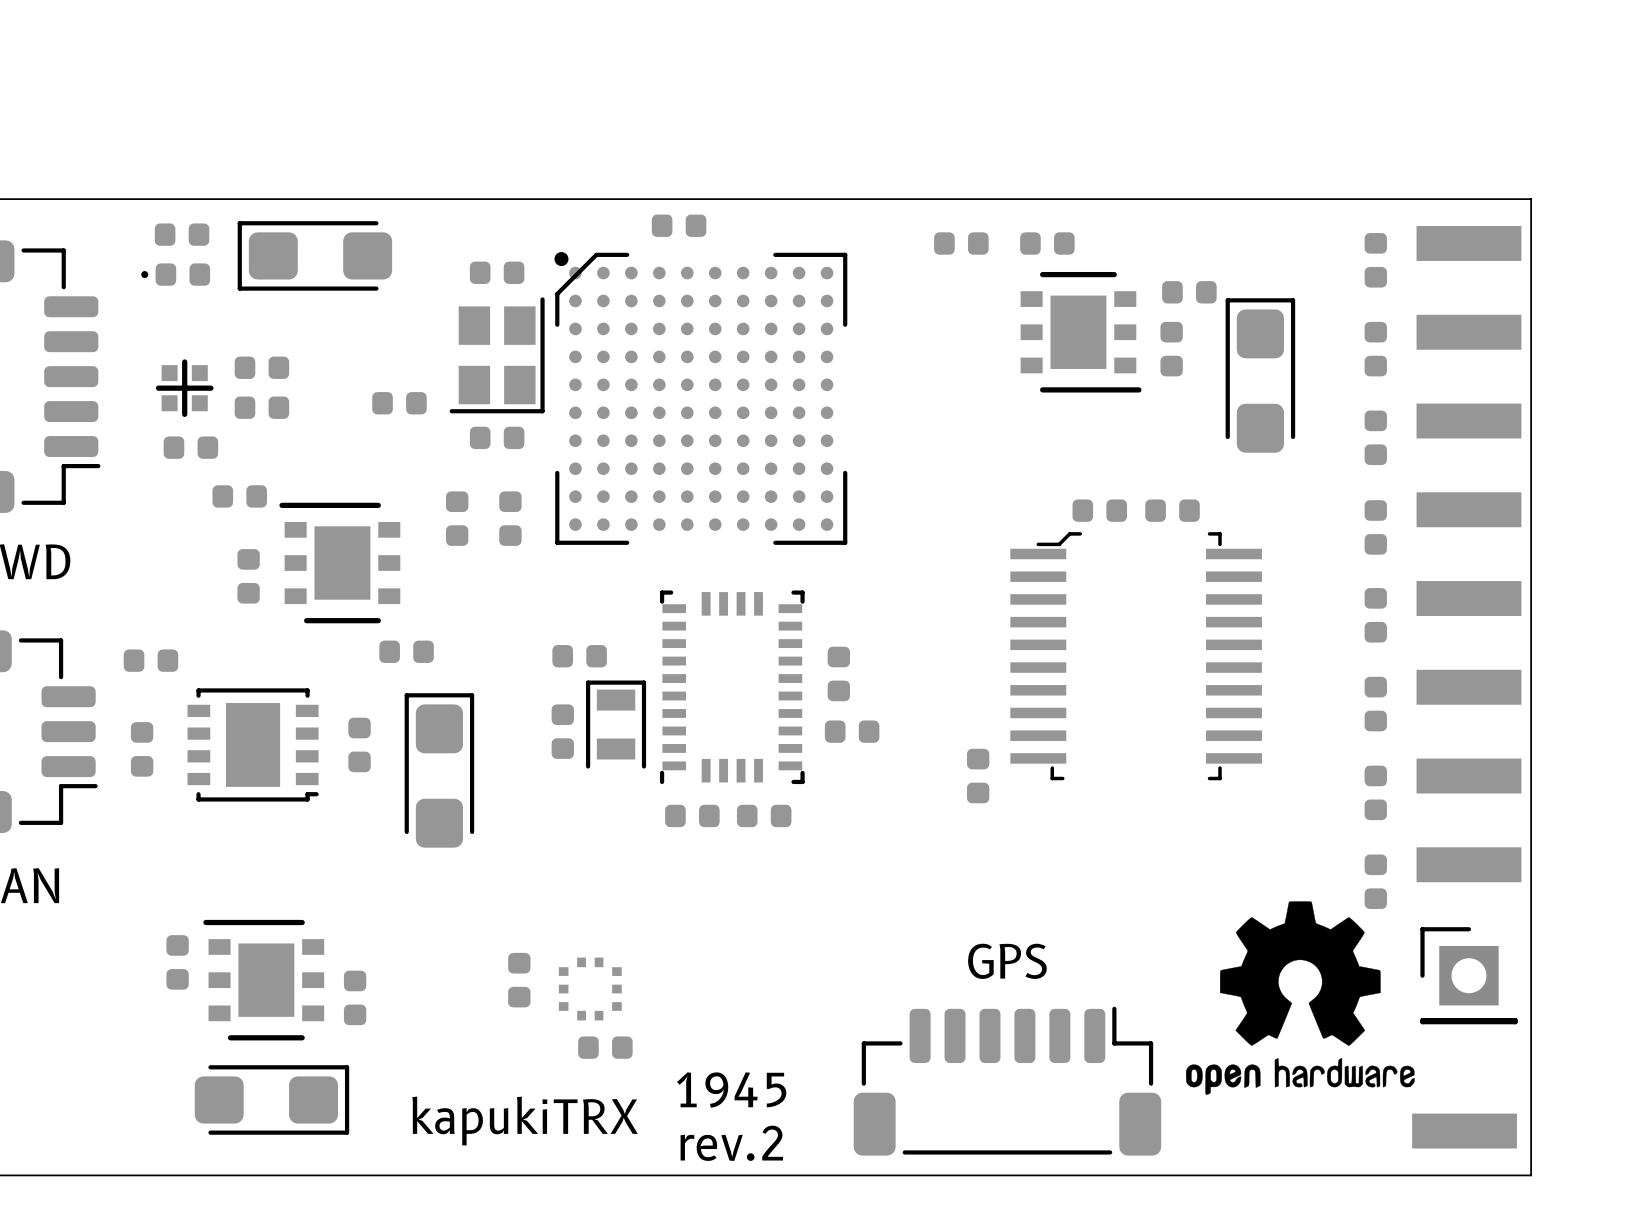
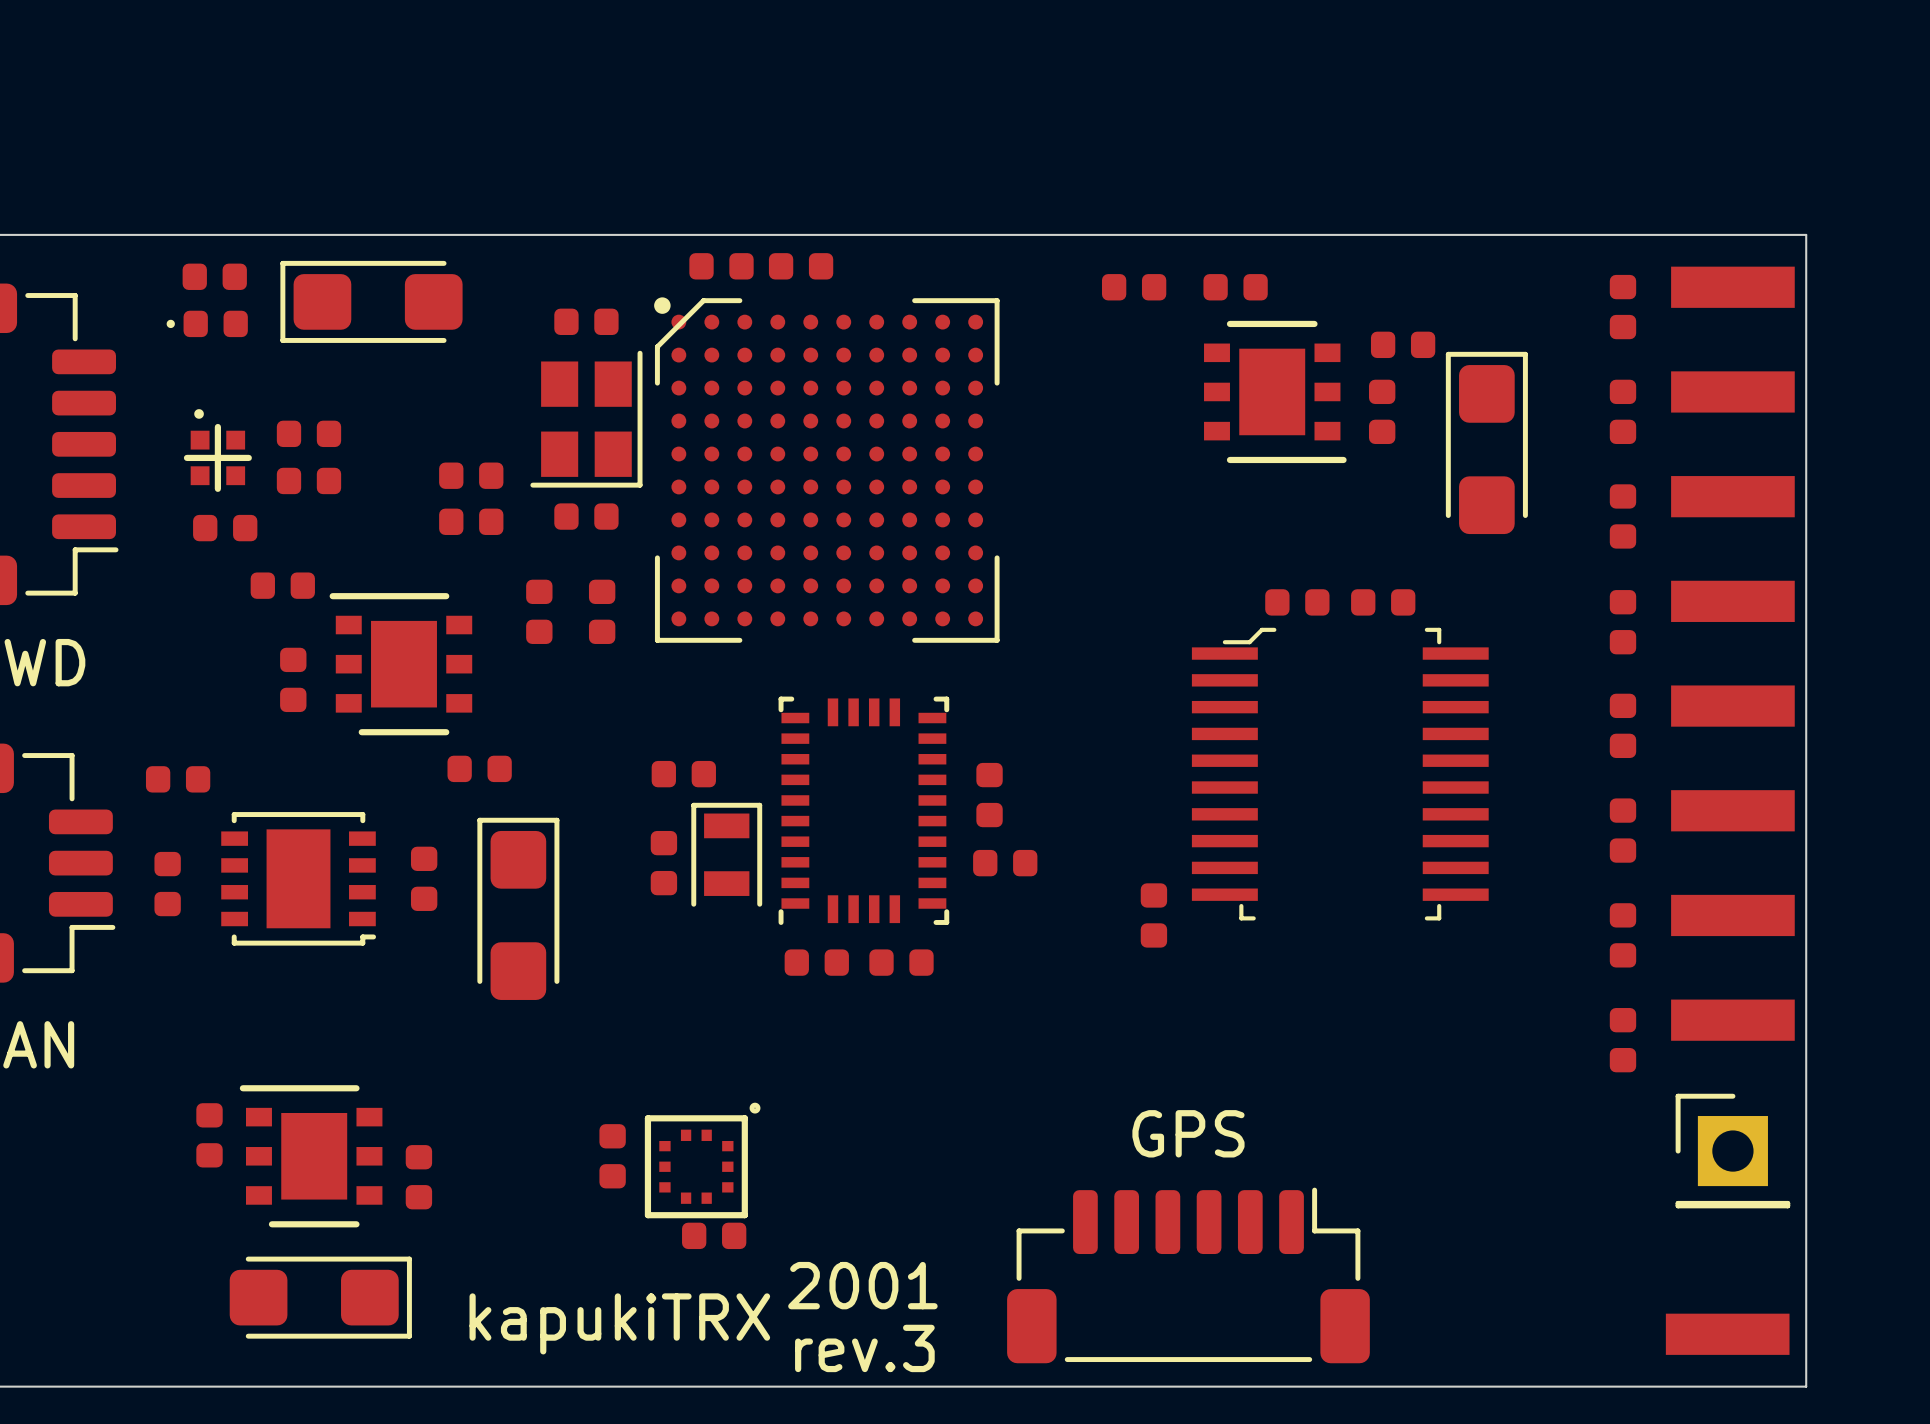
part: none -> (721, 266)
drawing: none -> [194, 409, 204, 419]
part: none -> (471, 521)
drawing: [1186, 901, 1415, 1095] -> none
part footprint: [558, 957, 622, 1021] -> [644, 1102, 761, 1219]
text: 1945 (731, 1089) -> 2001 (862, 1285)
text: rev.2 (731, 1143) -> rev.3 (864, 1348)

